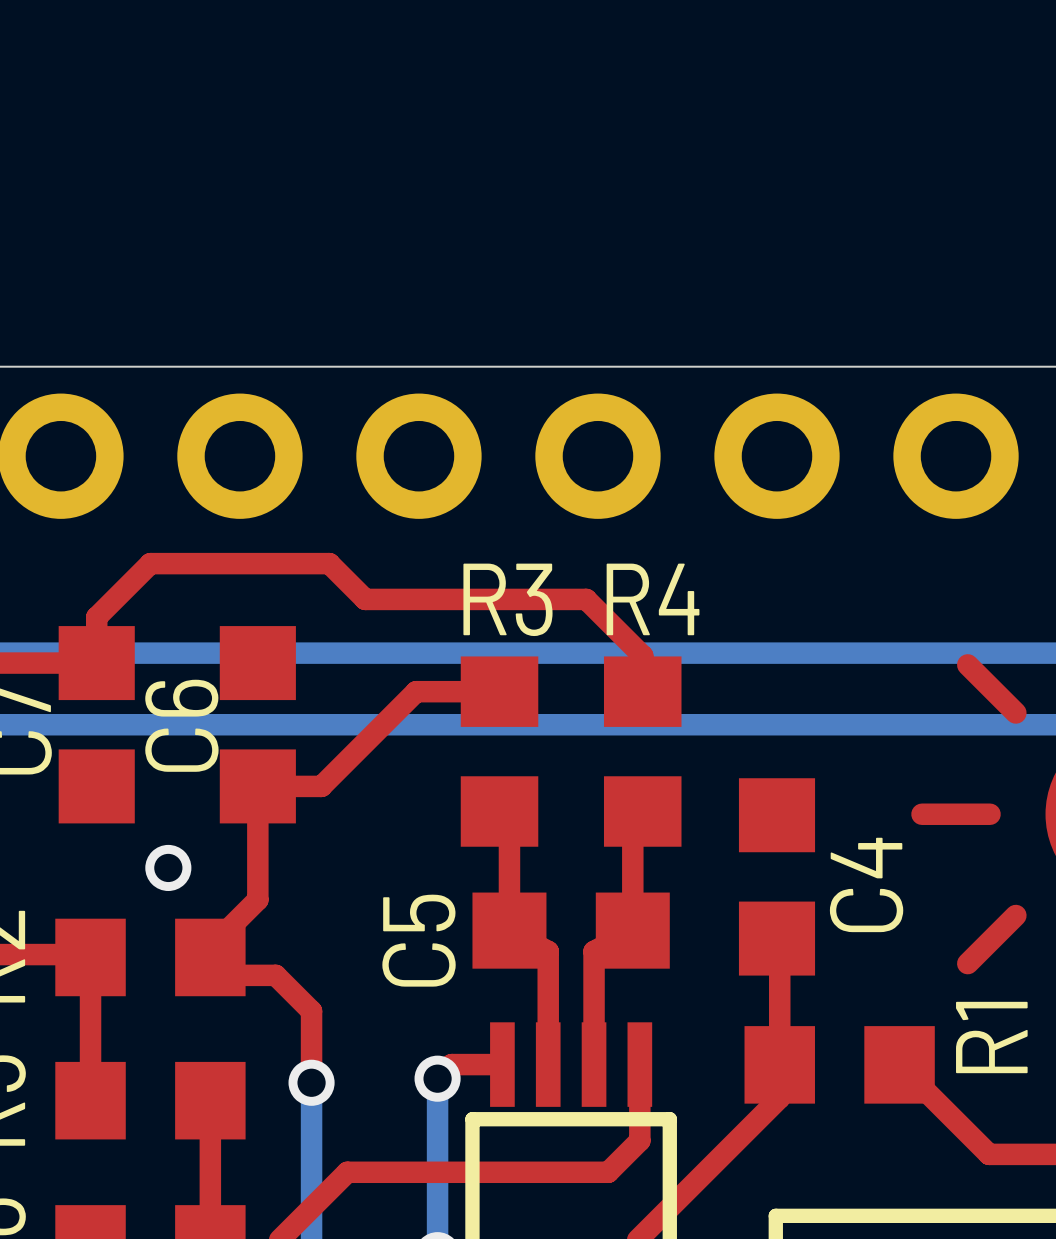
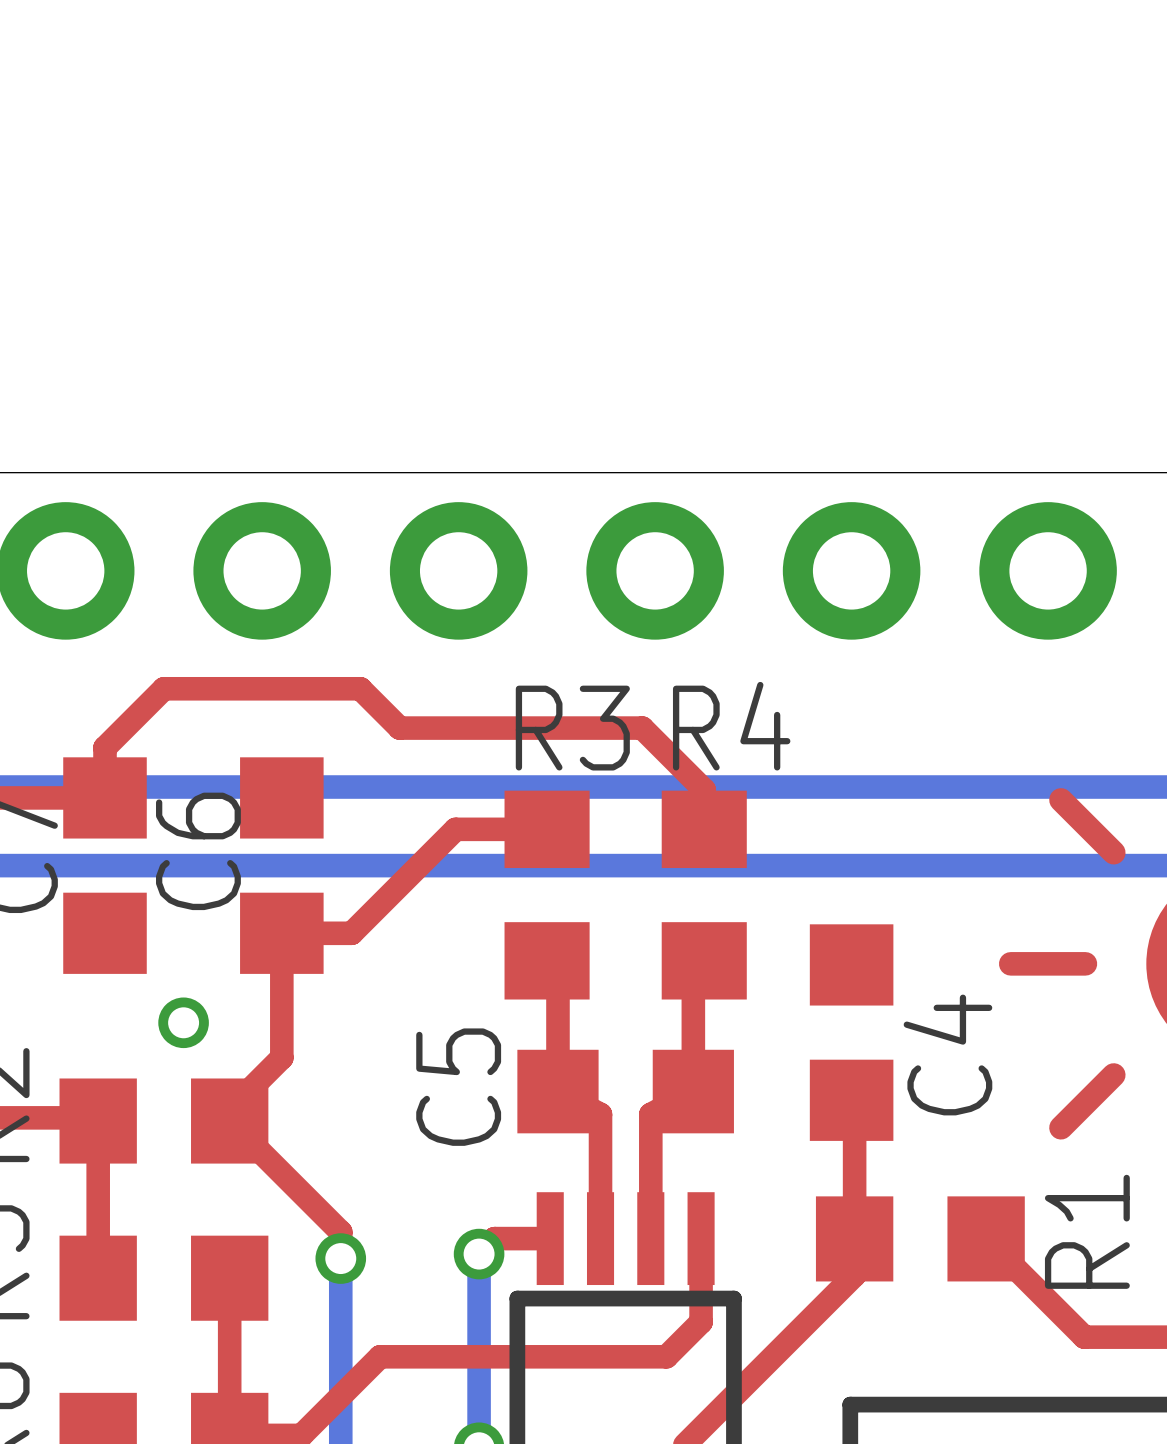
top track: (228, 975) (275, 975) (311, 1011) (311, 1058) -> (249, 1140) (340, 1232)

